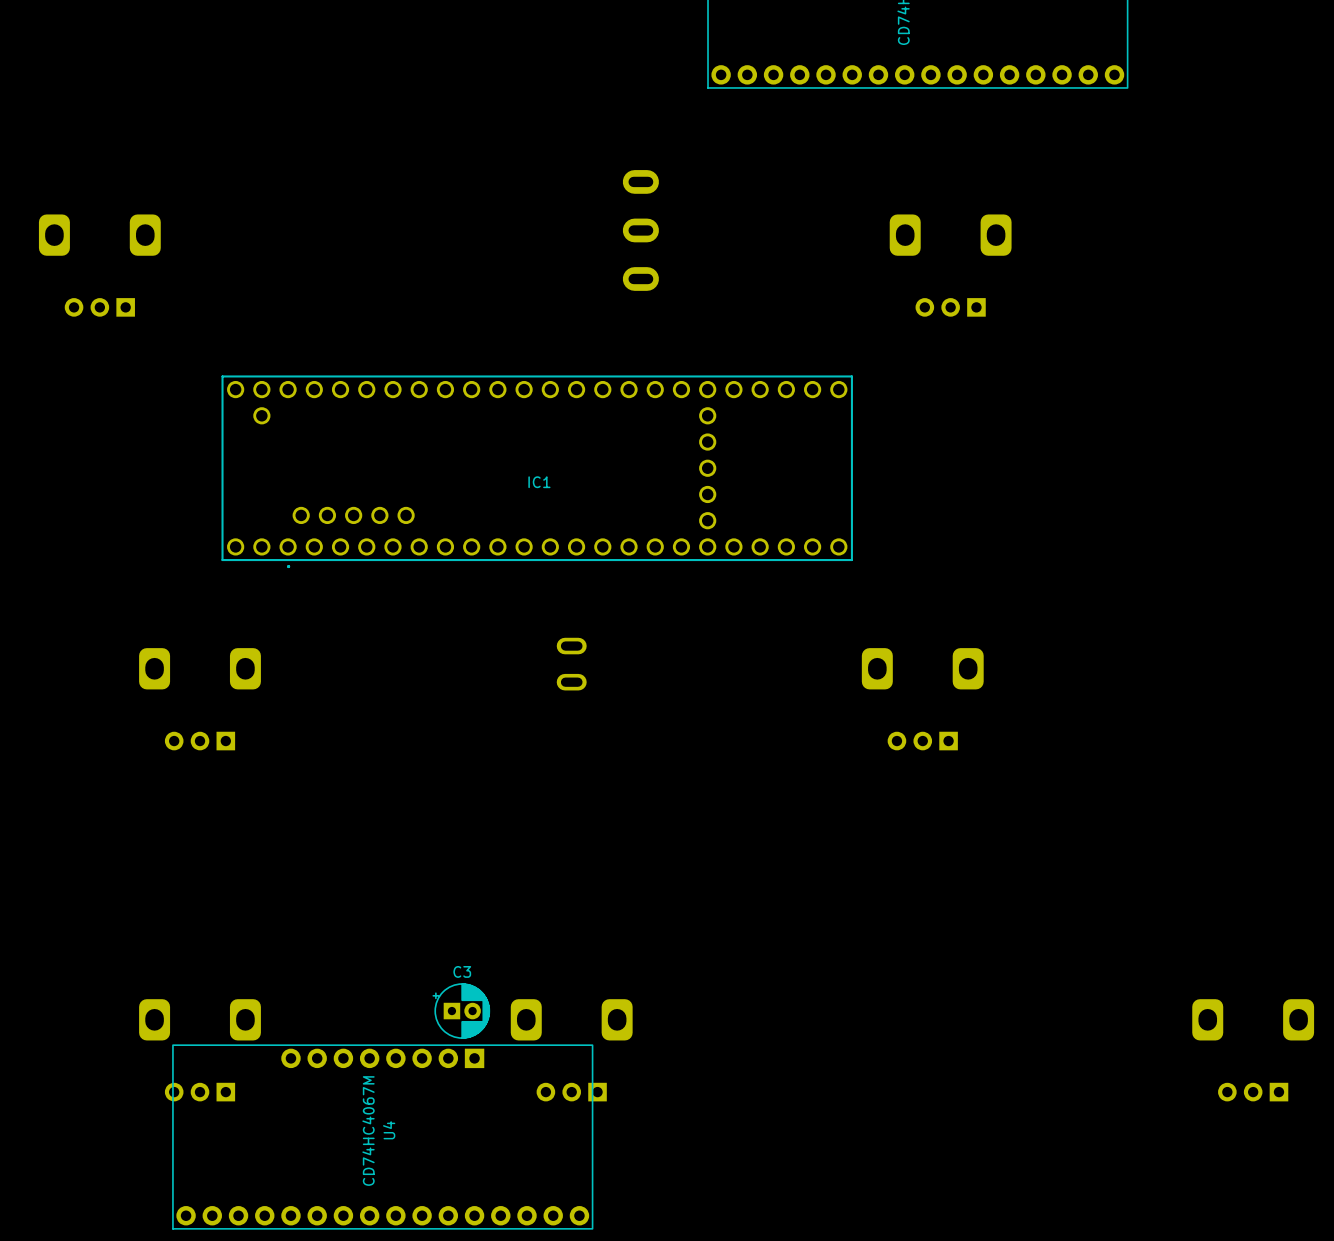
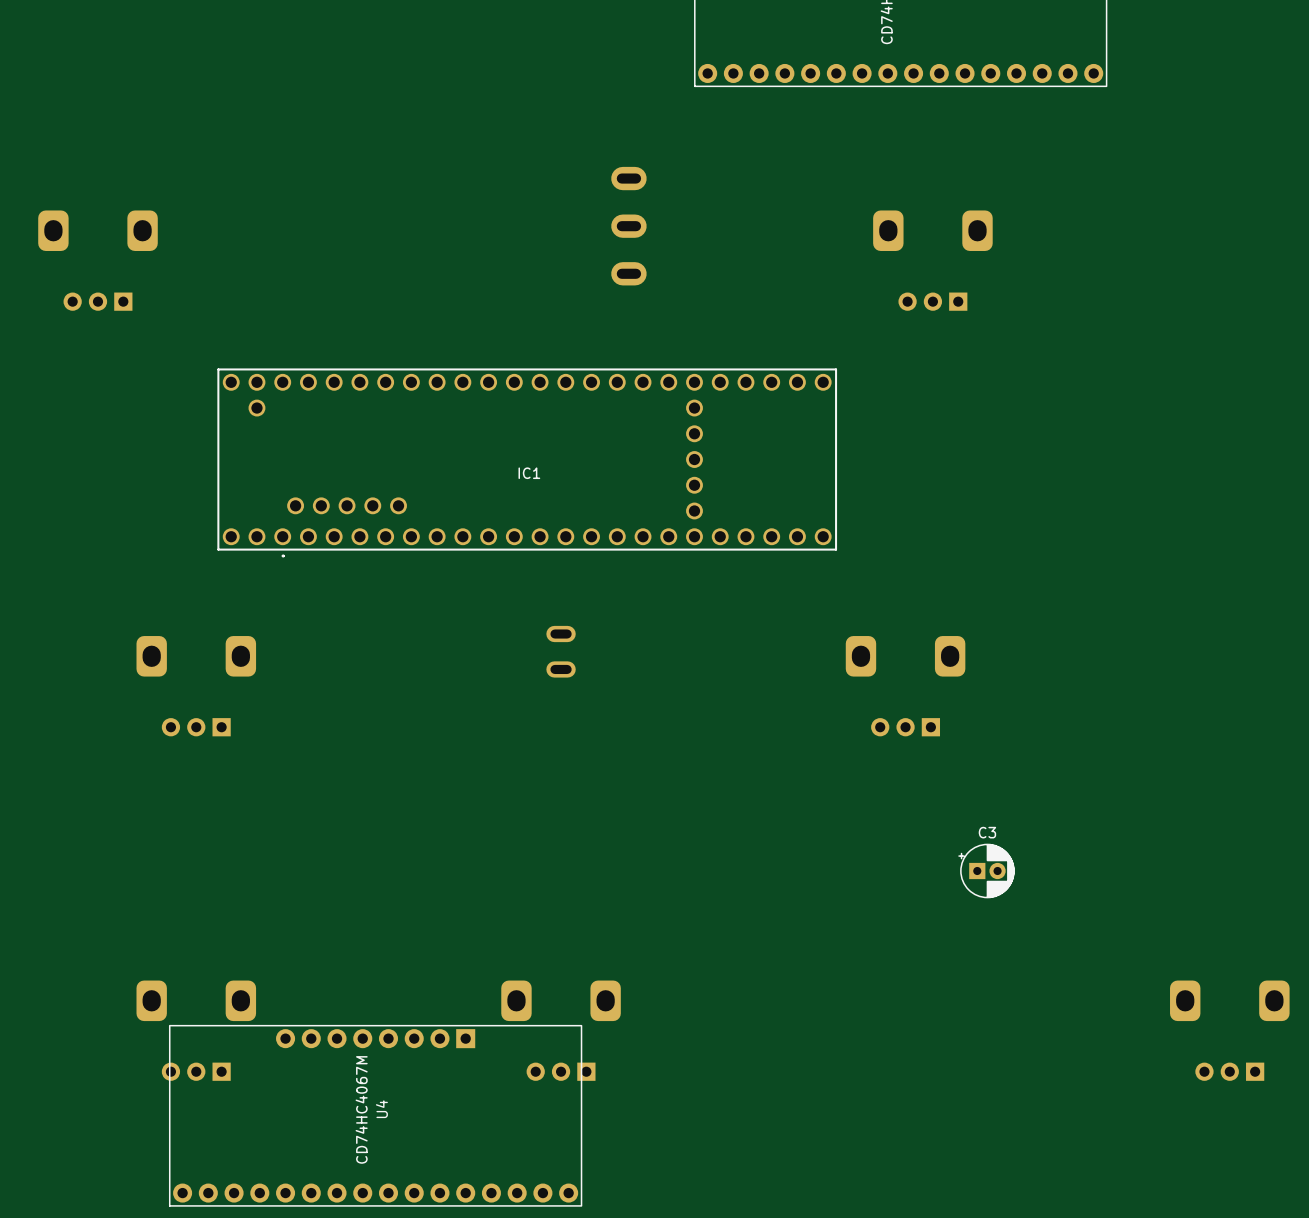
C3 position: (461, 1011) -> (986, 871)

